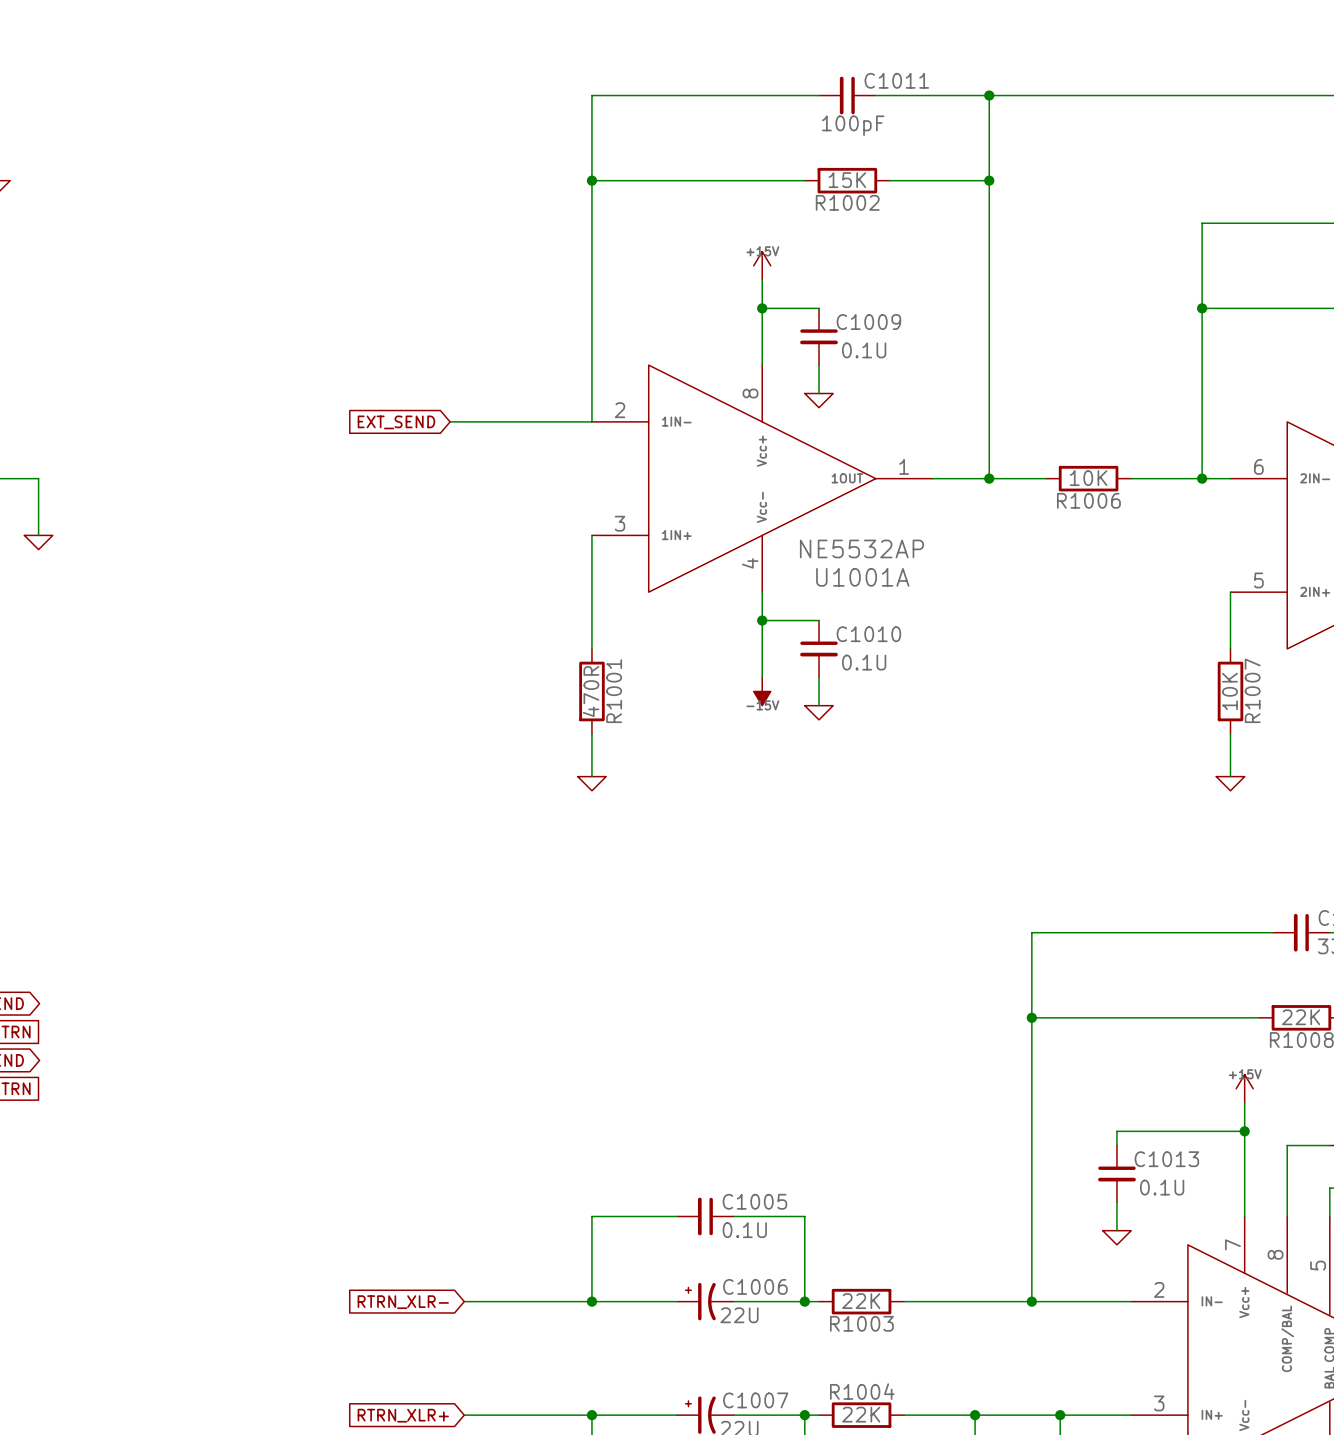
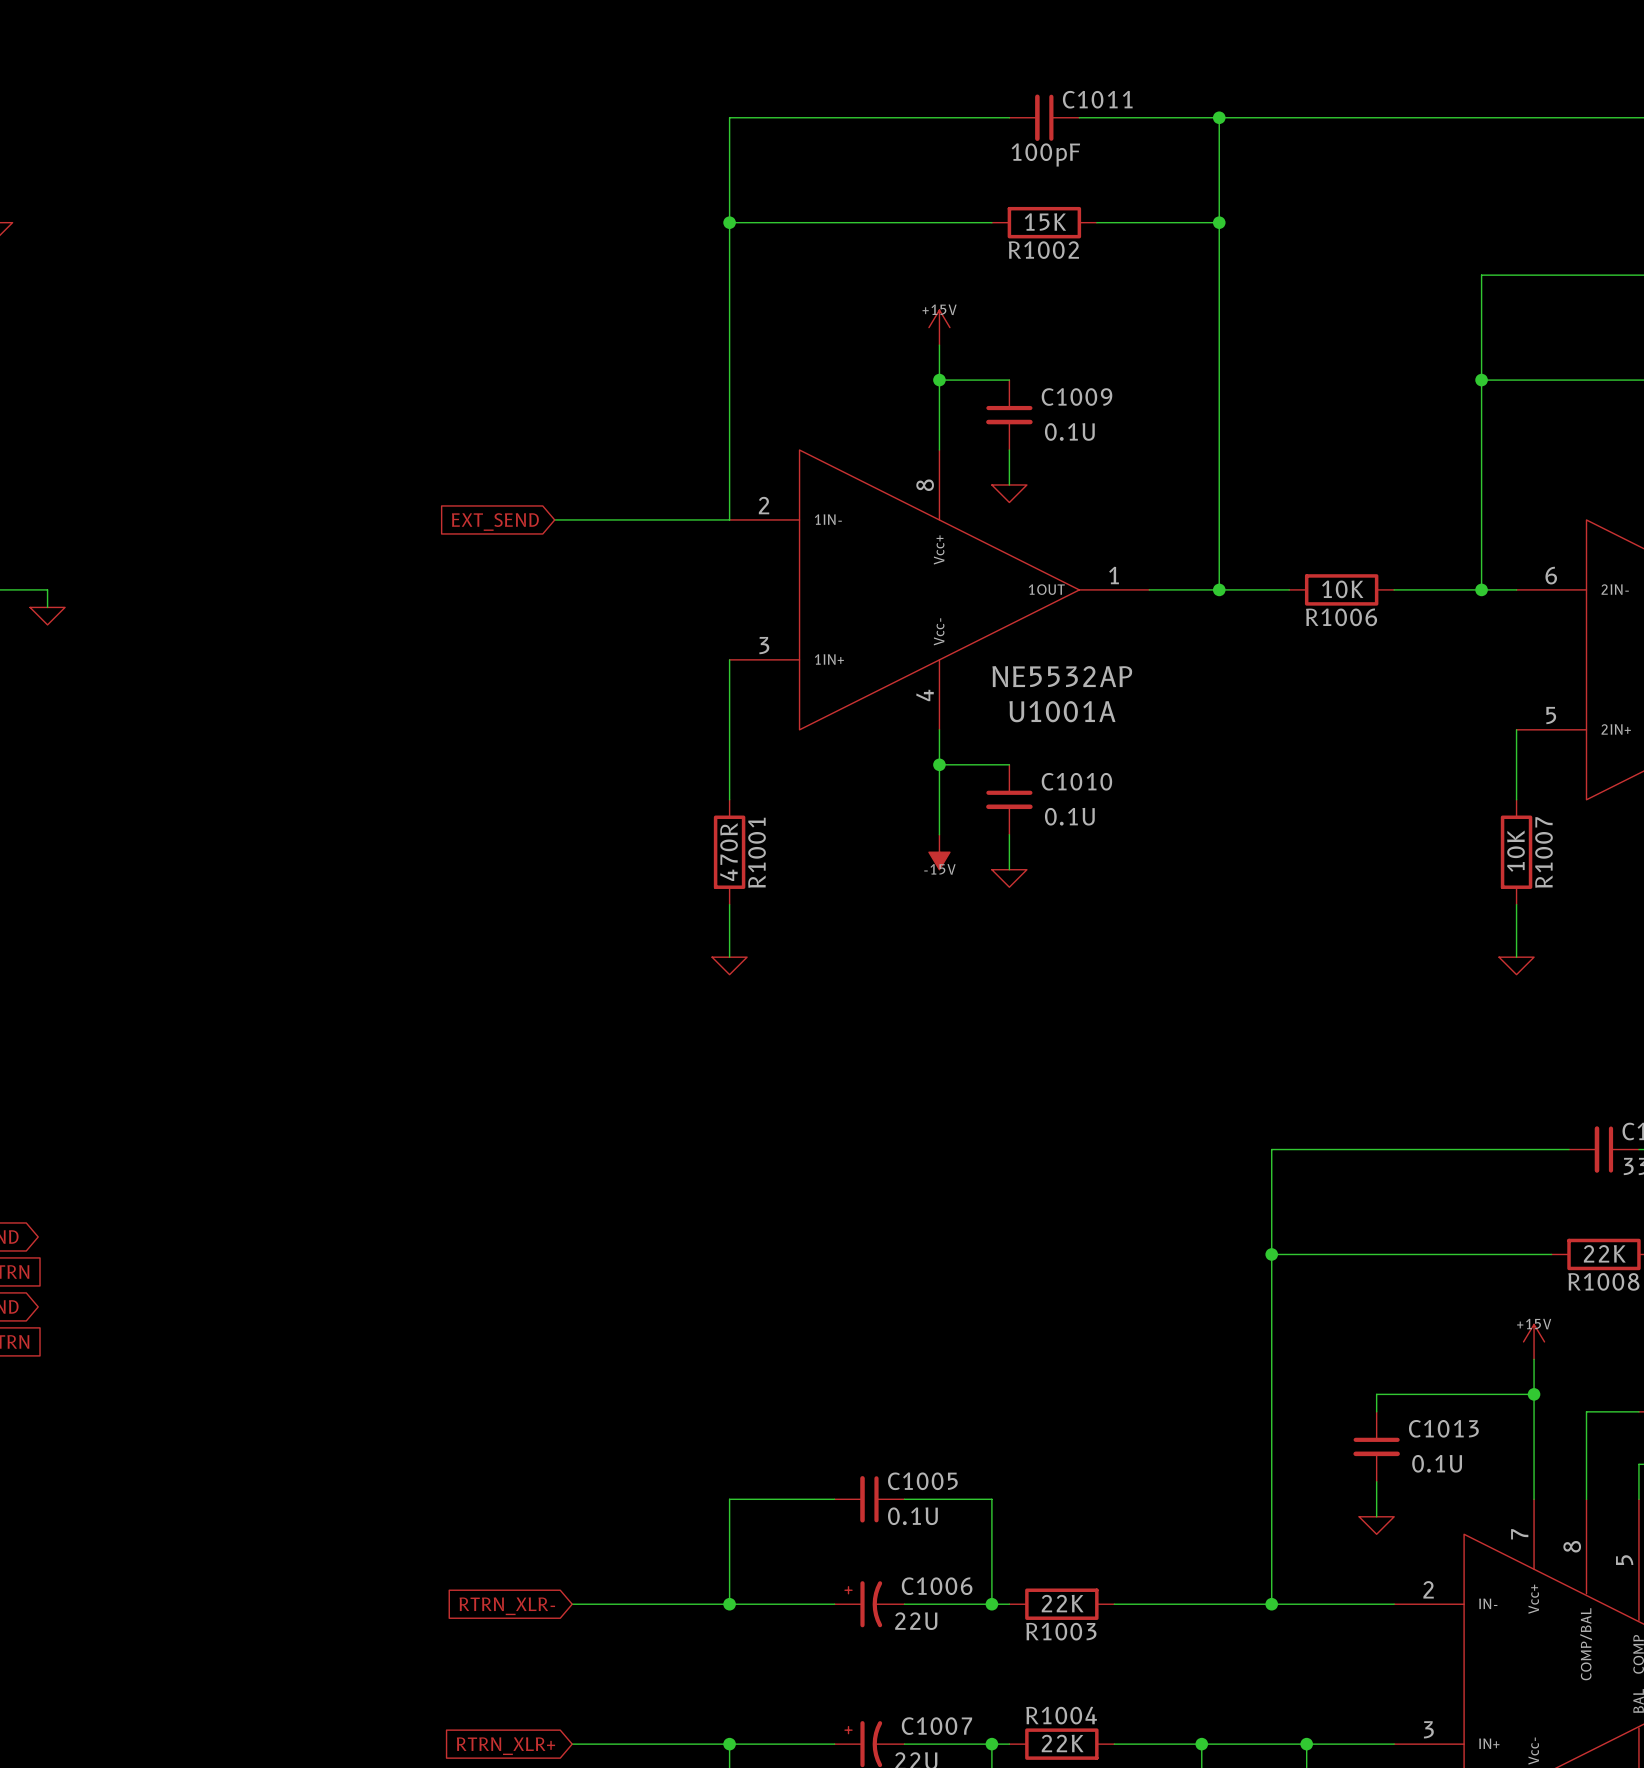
wire: (38, 492) (38, 535) -> none
power symbol position: (38, 542) -> (47, 616)

